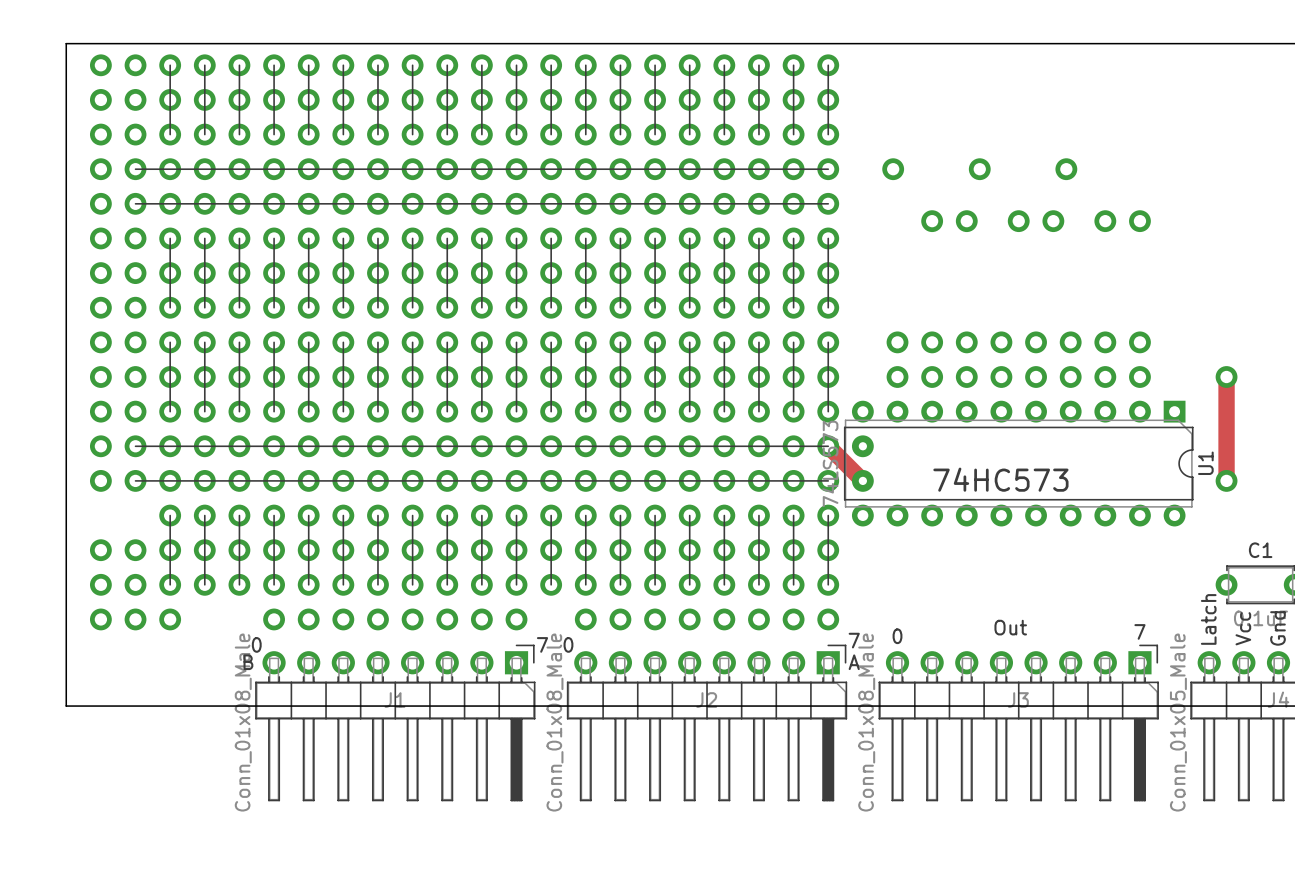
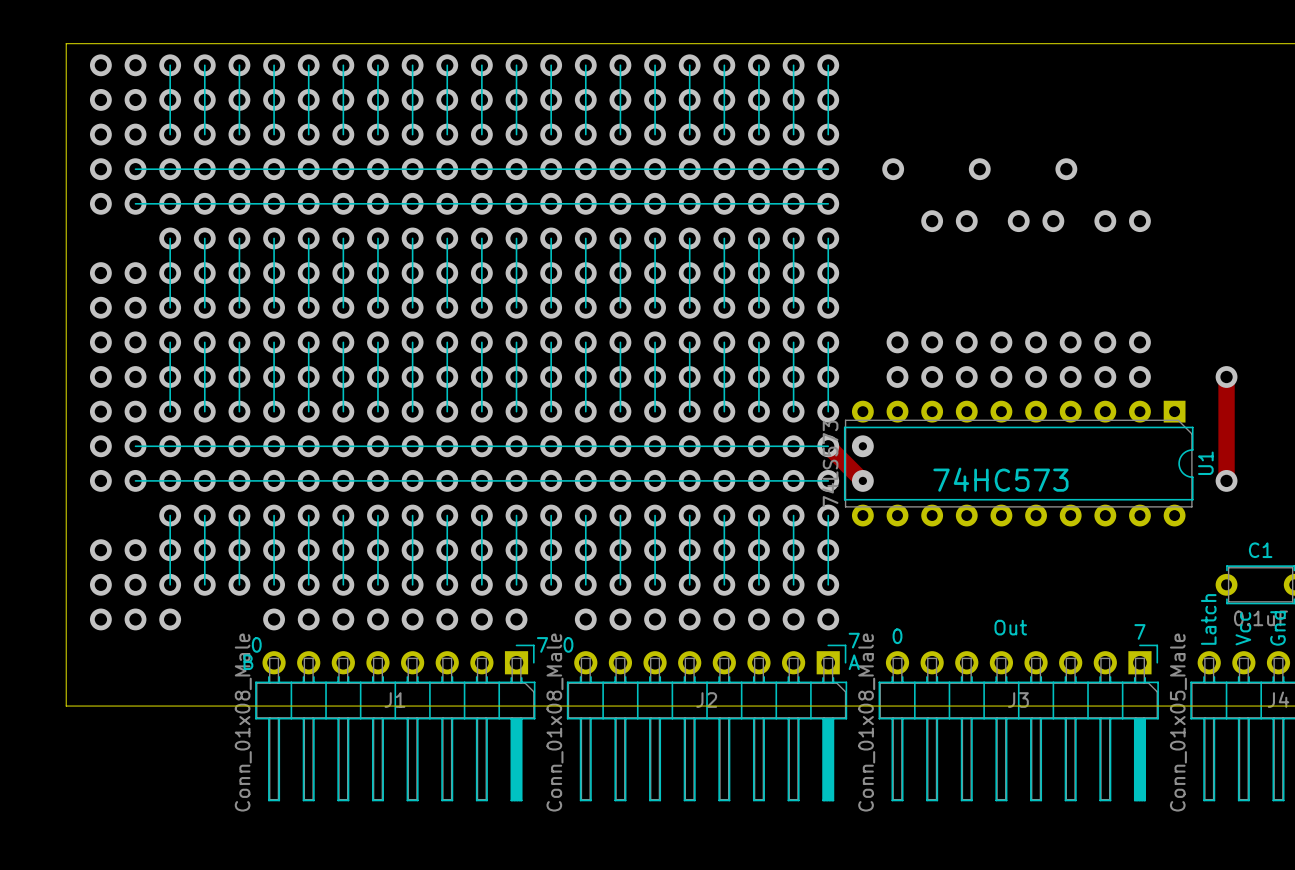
via: (100, 238) -> none
via: (135, 238) -> none

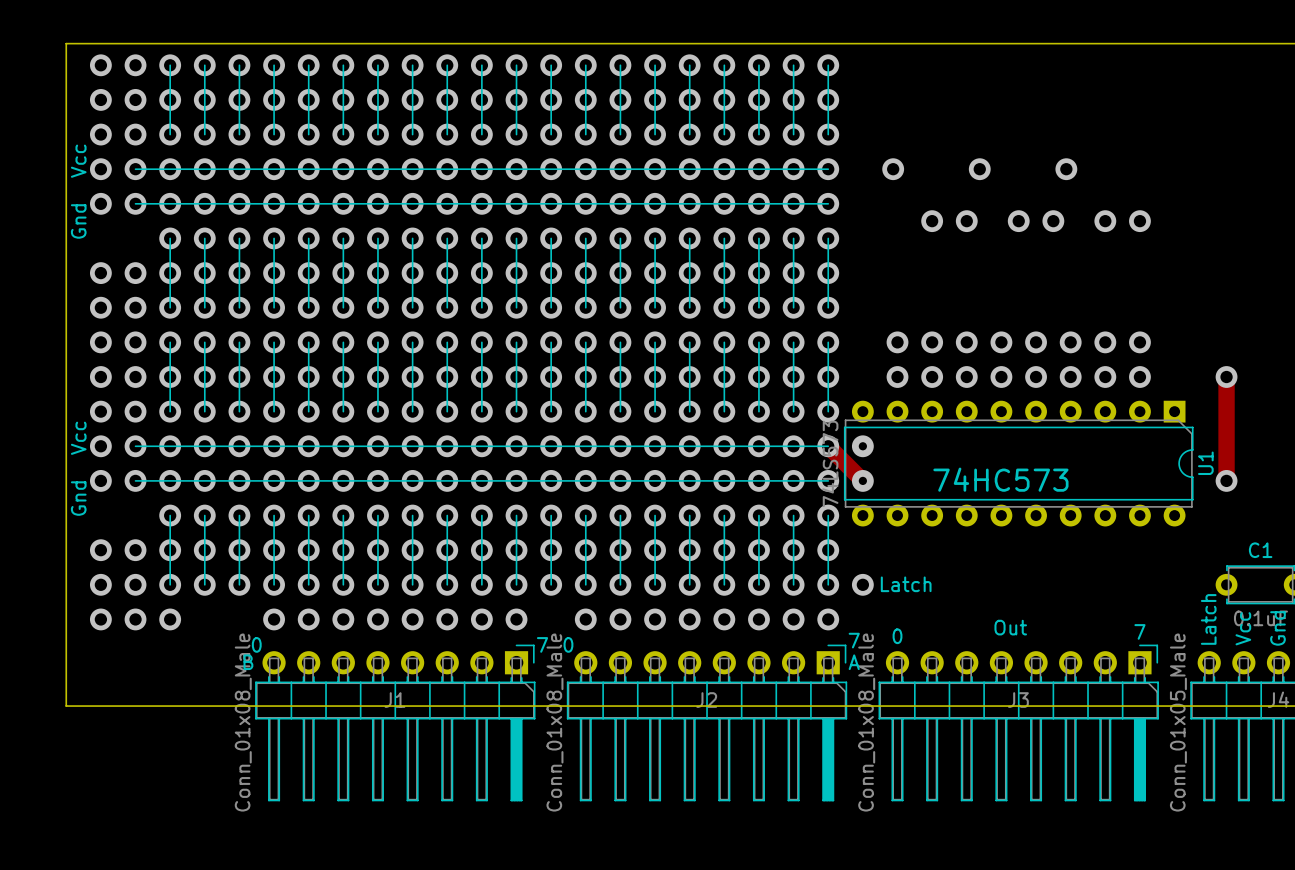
text: none -> Vcc (78, 161)
text: none -> Gnd (78, 221)
text: none -> Vcc (78, 438)
text: none -> Gnd (78, 498)
via: none -> (862, 584)
text: none -> Latch (906, 584)

